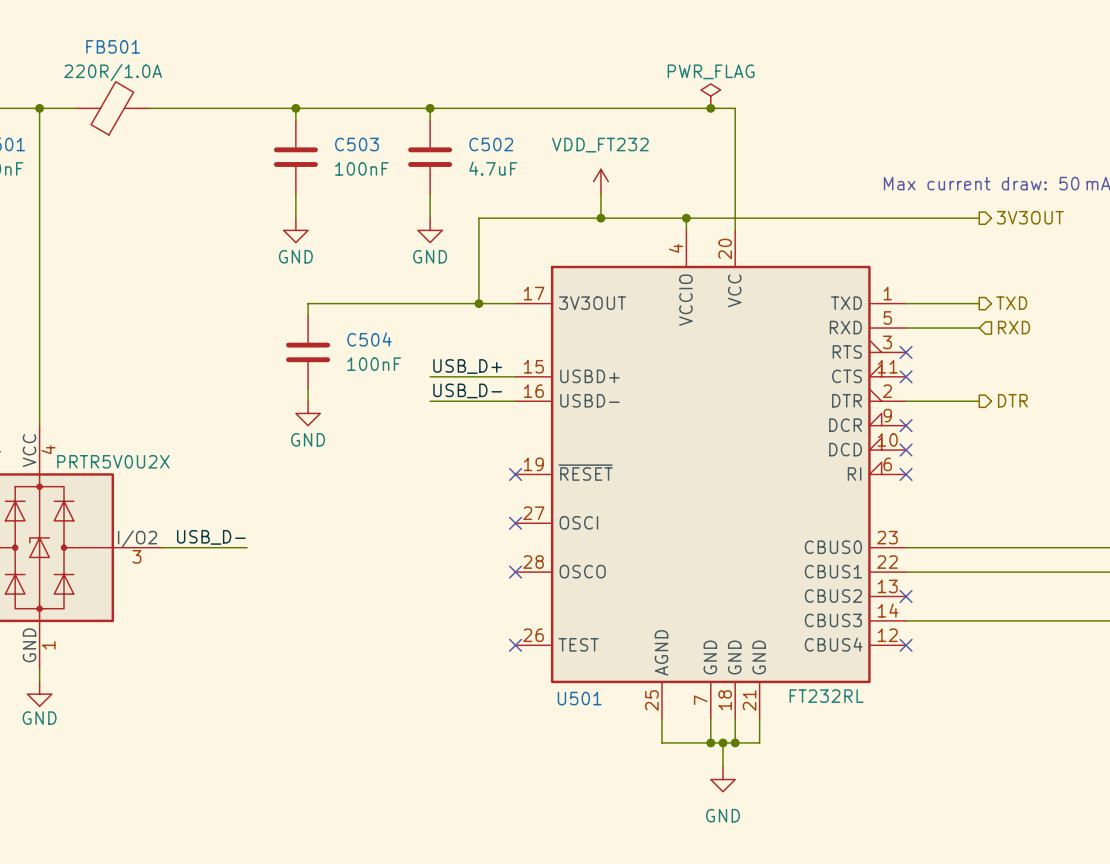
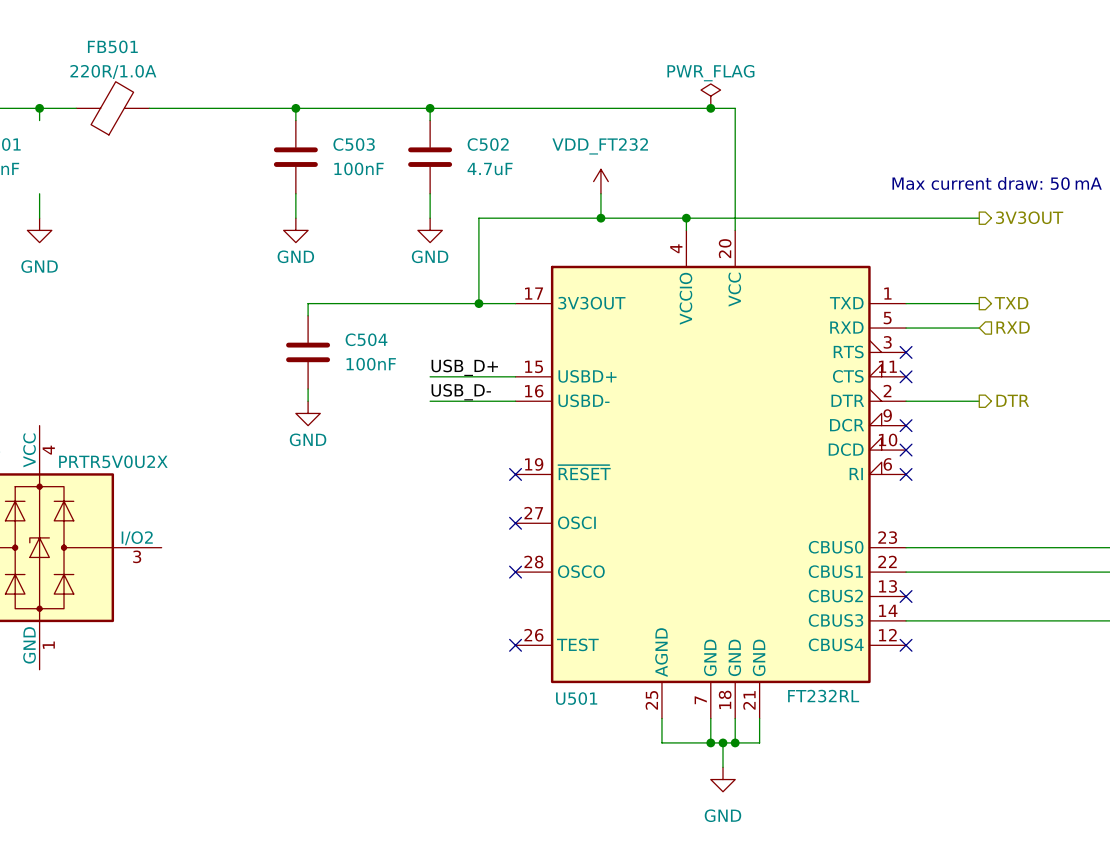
wire: (39, 120) (39, 193) -> none
wire: (39, 218) (39, 425) -> none
power symbol: none -> GND (39, 230)
label: USB_D- (211, 537) -> none
wire: (161, 547) (247, 547) -> none
wire: (39, 669) (39, 681) -> none
power symbol: GND (39, 694) -> none

